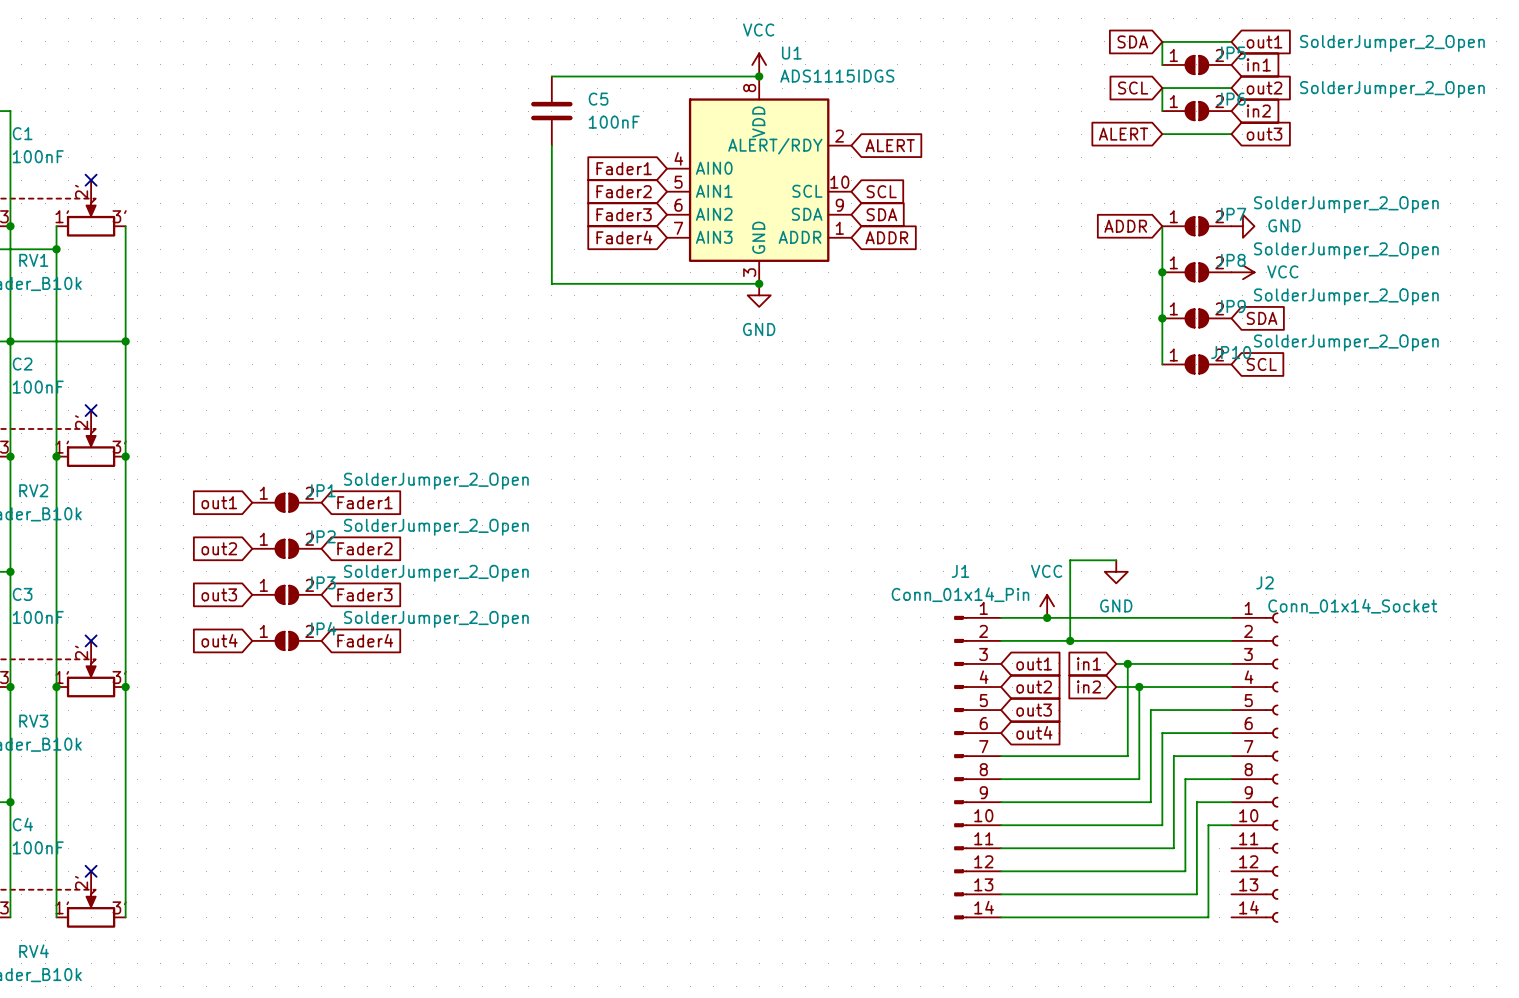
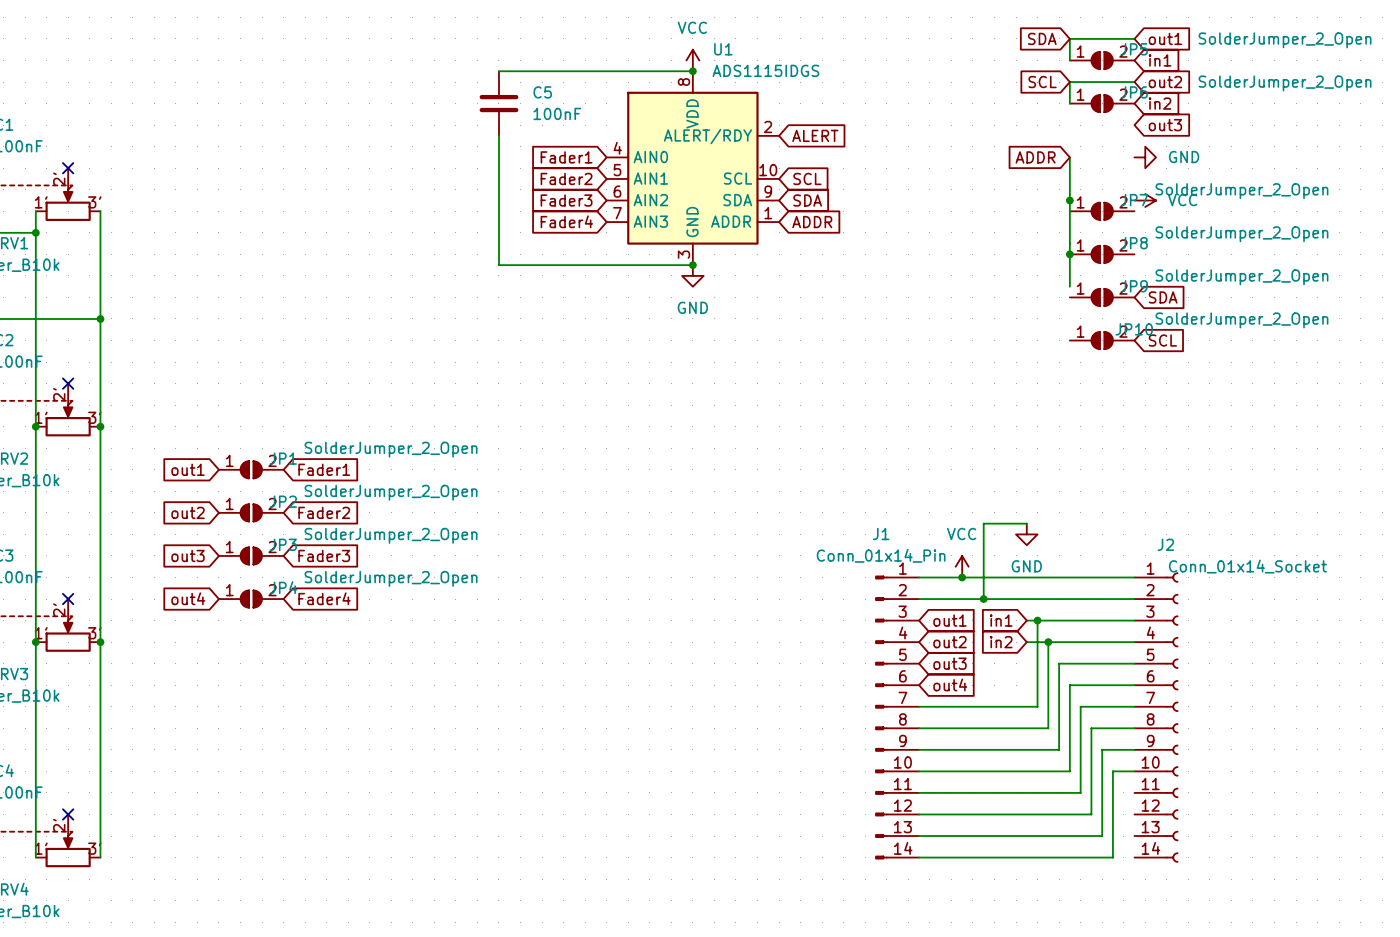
global label: ALERT (1123, 134) -> none
wire: (1162, 134) (1231, 134) -> none
junction: none -> (1069, 200)
global label position: ADDR (1125, 226) -> ADDR (1035, 157)
power symbol position: GND (1242, 226) -> GND (1145, 157)
power symbol position: VCC (1242, 272) -> VCC (1145, 200)
wire: (1162, 306) (1162, 364) -> (1069, 157) (1069, 211)
junction: (1162, 318) -> none

